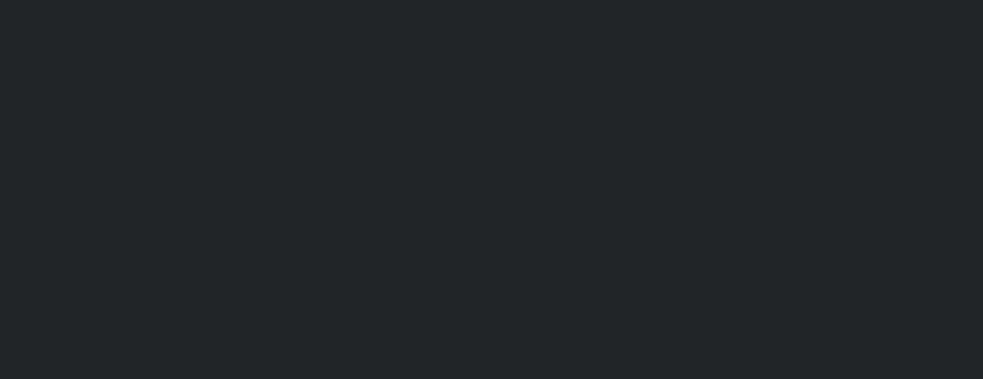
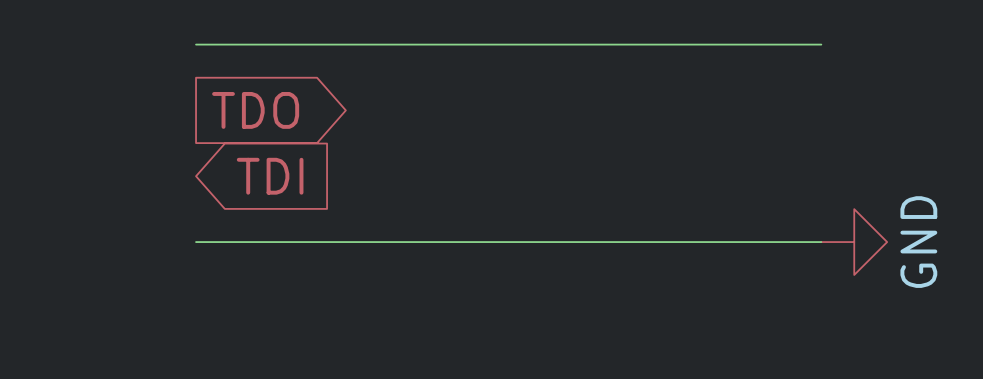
wire: none -> (196, 44) (821, 44)
global label: none -> TDO (255, 110)
global label: none -> TDI (270, 176)
wire: none -> (196, 242) (821, 242)
power symbol: none -> GND (854, 242)

